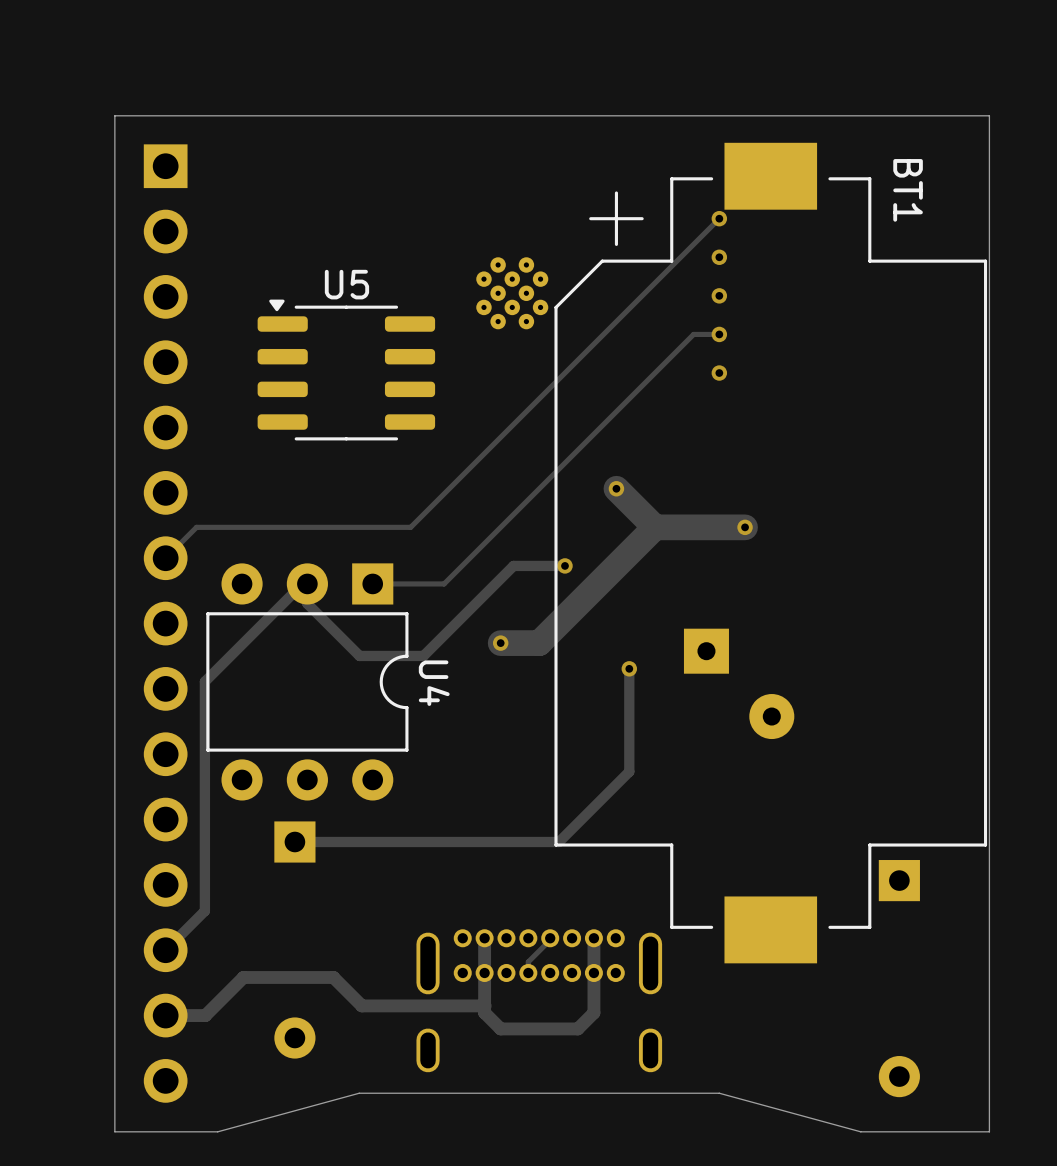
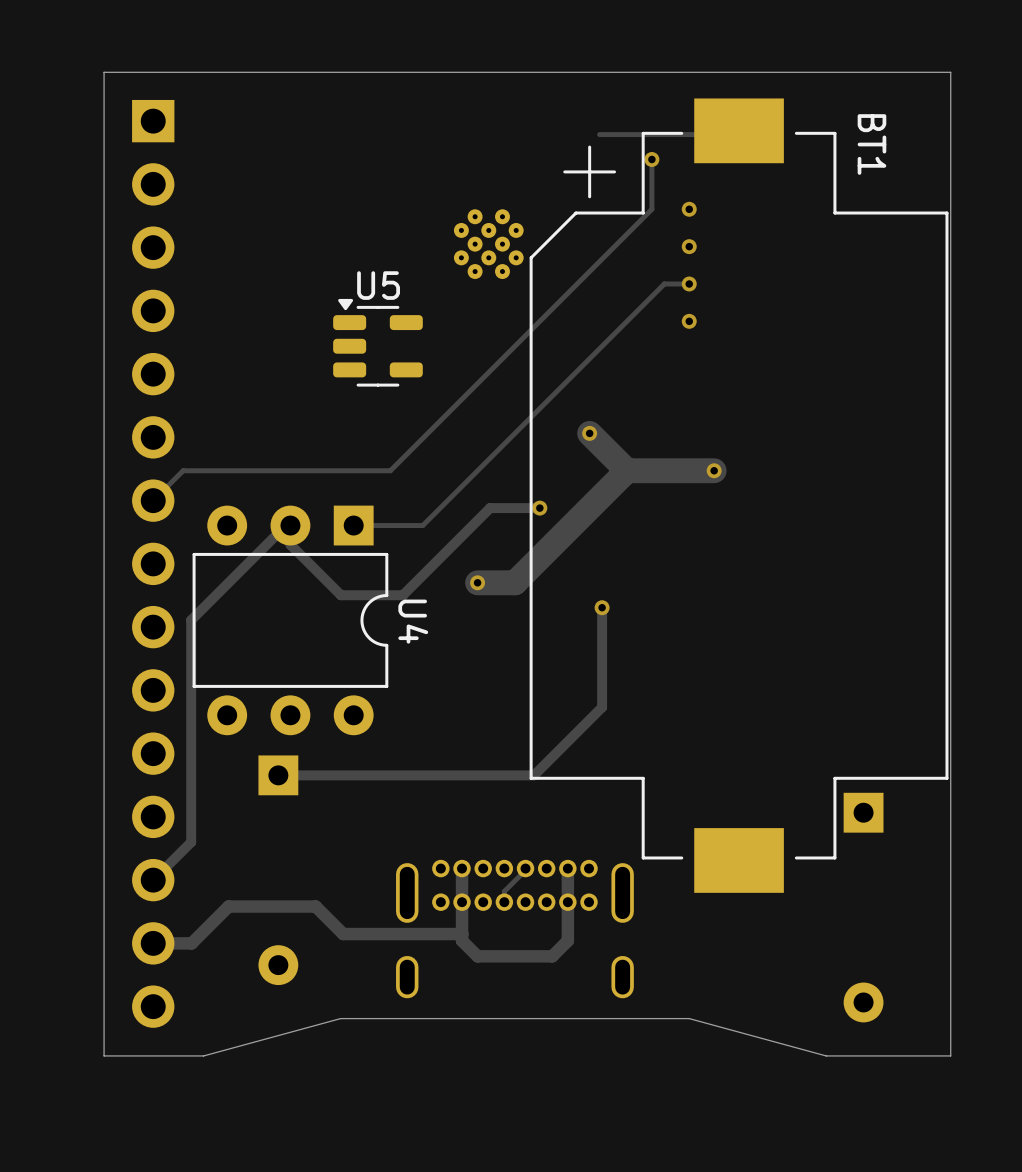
track: none -> (739, 130) (735, 134) (599, 134)
track: (719, 218) (680, 257) -> (651, 159) (651, 209)
via position: (719, 218) -> (651, 159)
U5 footprint: [257, 299, 436, 441] -> [333, 298, 423, 387]
part: (739, 683) -> none

